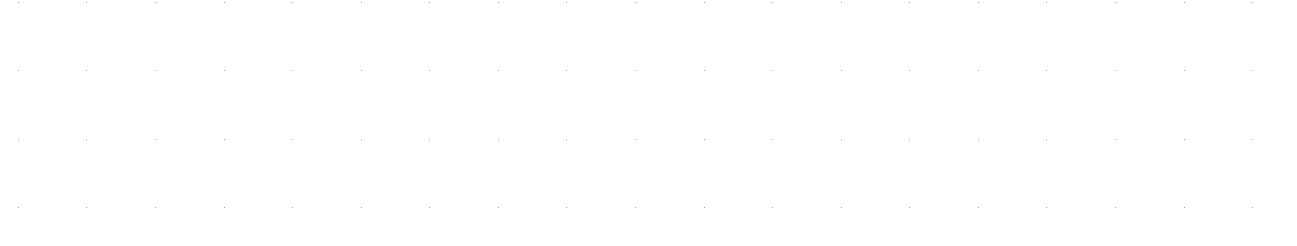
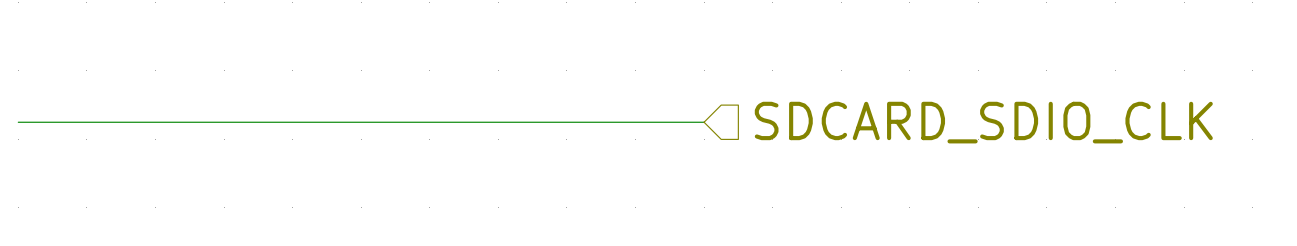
wire: none -> (18, 122) (704, 122)
hierarchical label: none -> SDCARD_SDIO_CLK (983, 122)

